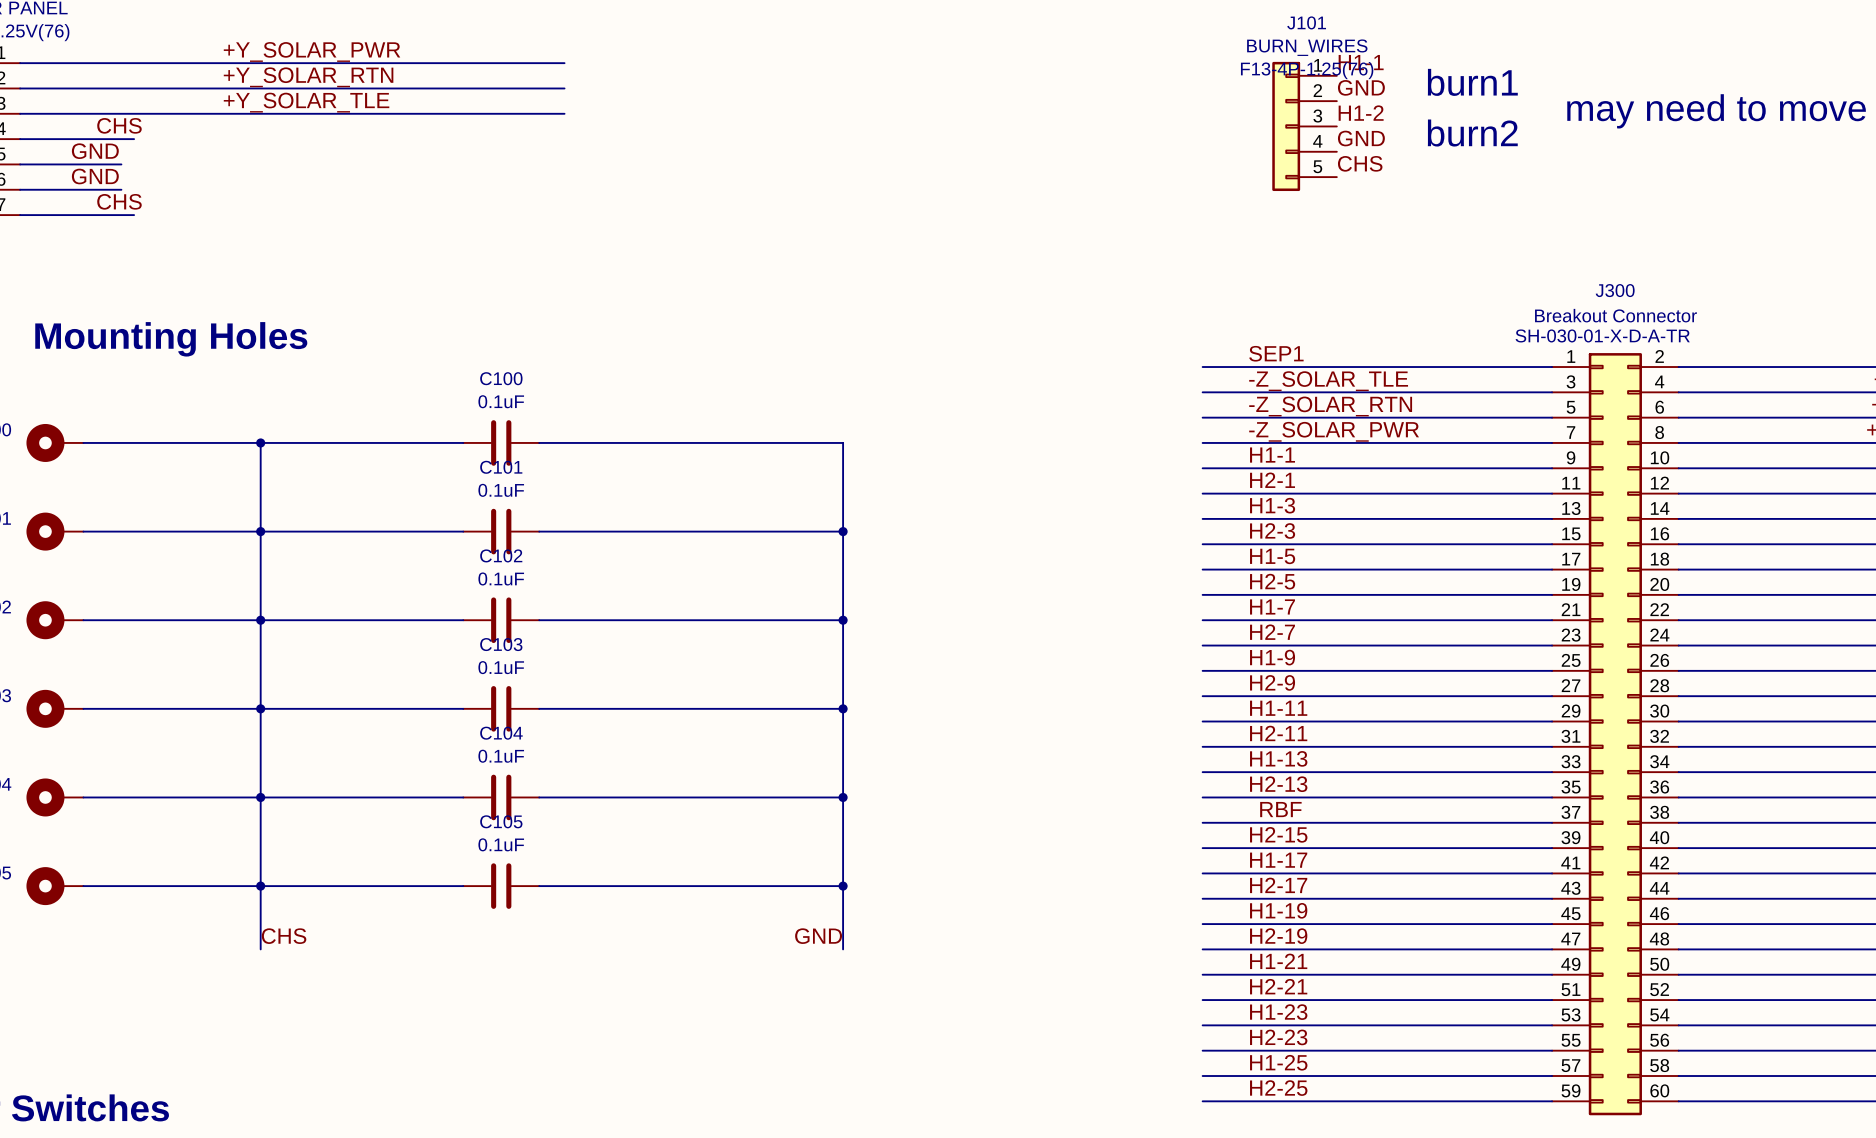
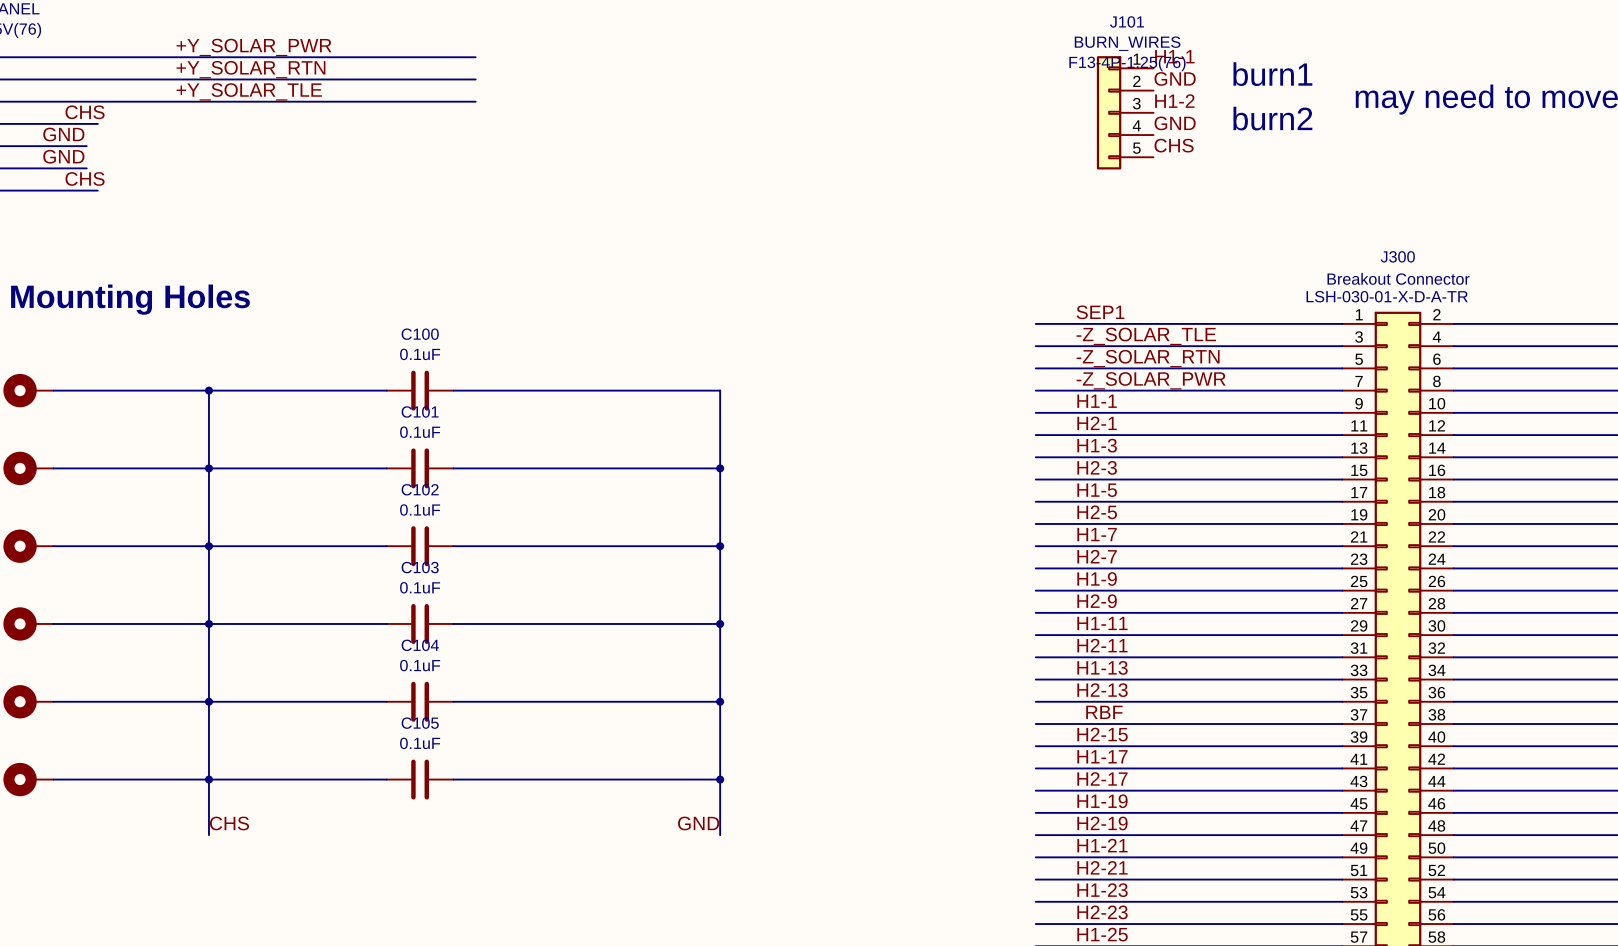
J300 text: SH-030-01-X-D-A-TR (1602, 335) -> LSH-030-01-X-D-A-TR (1387, 296)

